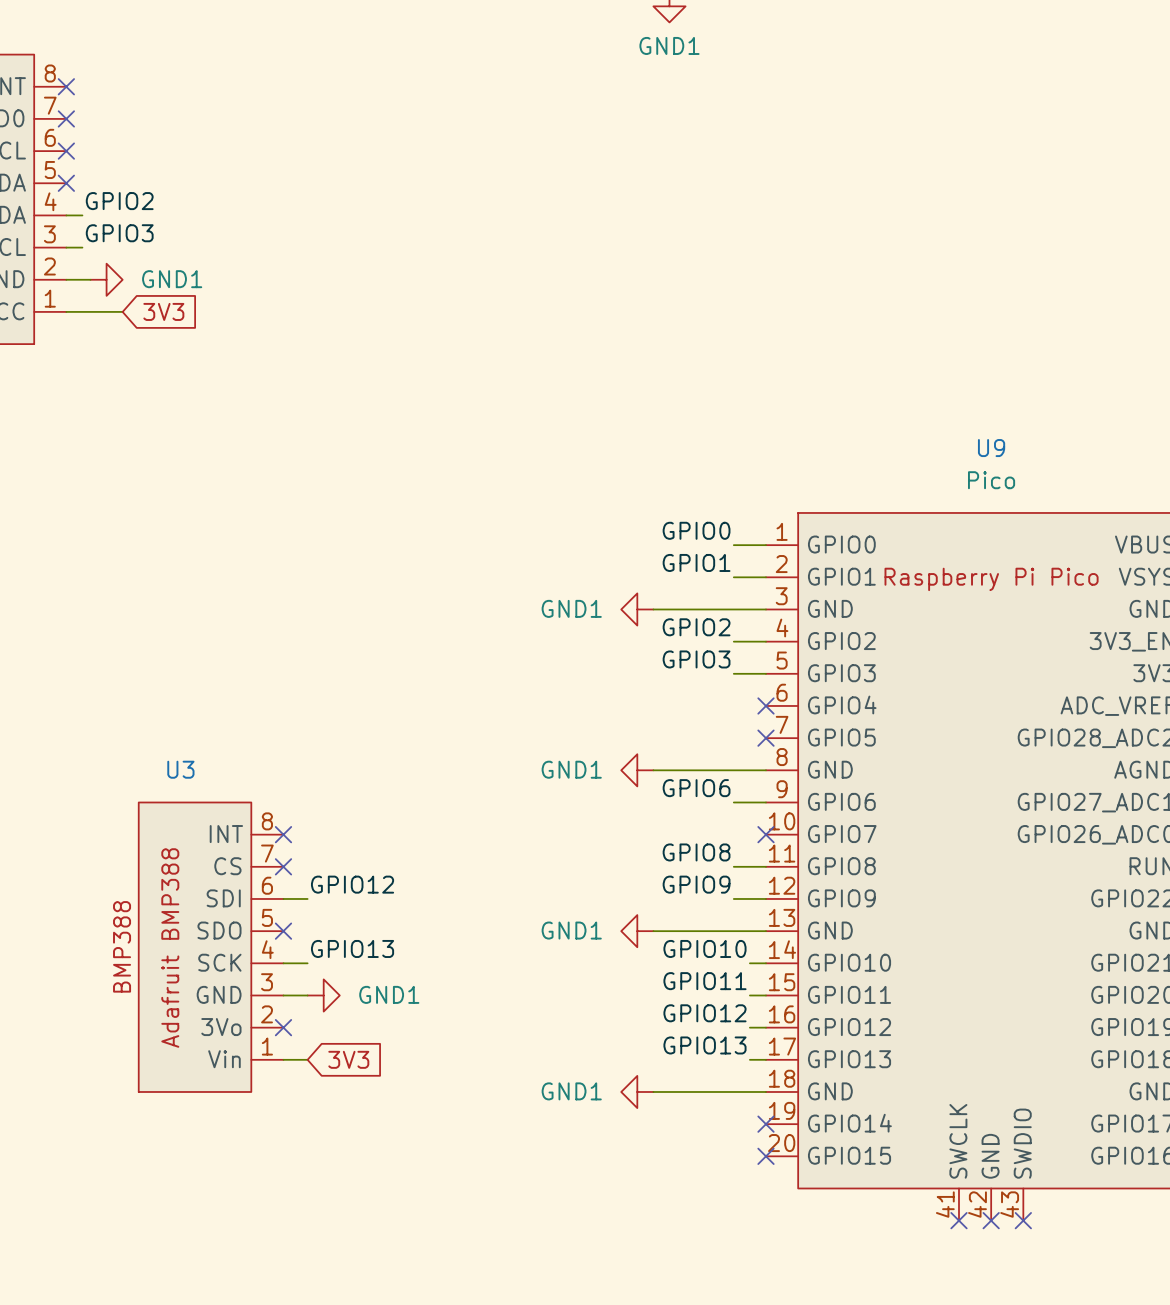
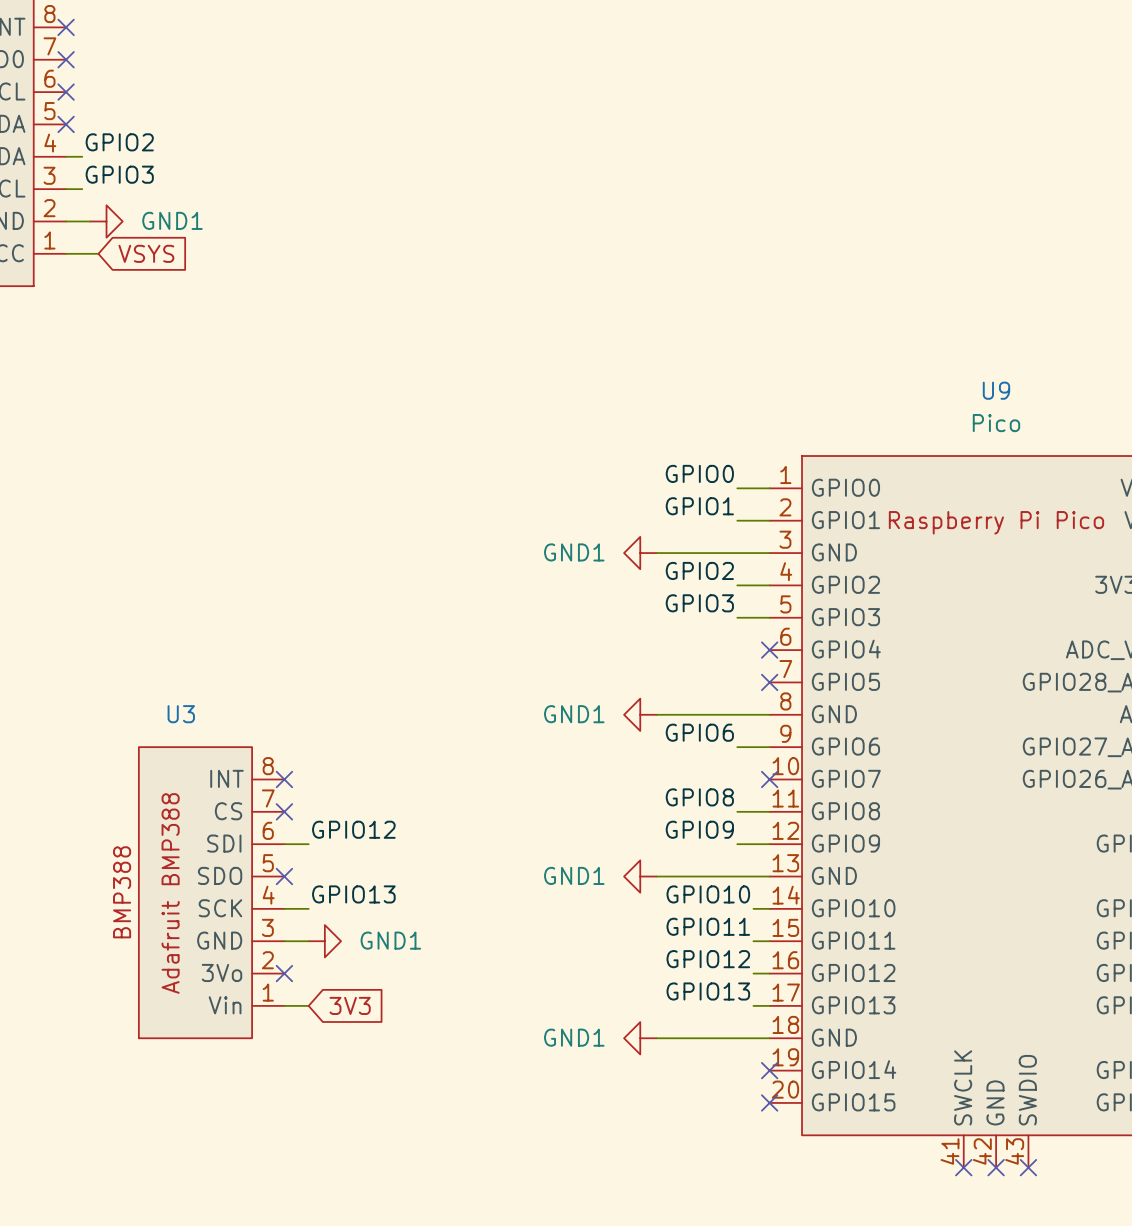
wire: (98, 311) (122, 311) -> none
global label: none -> VSYS (146, 253)
global label: 3V3 (163, 311) -> none

